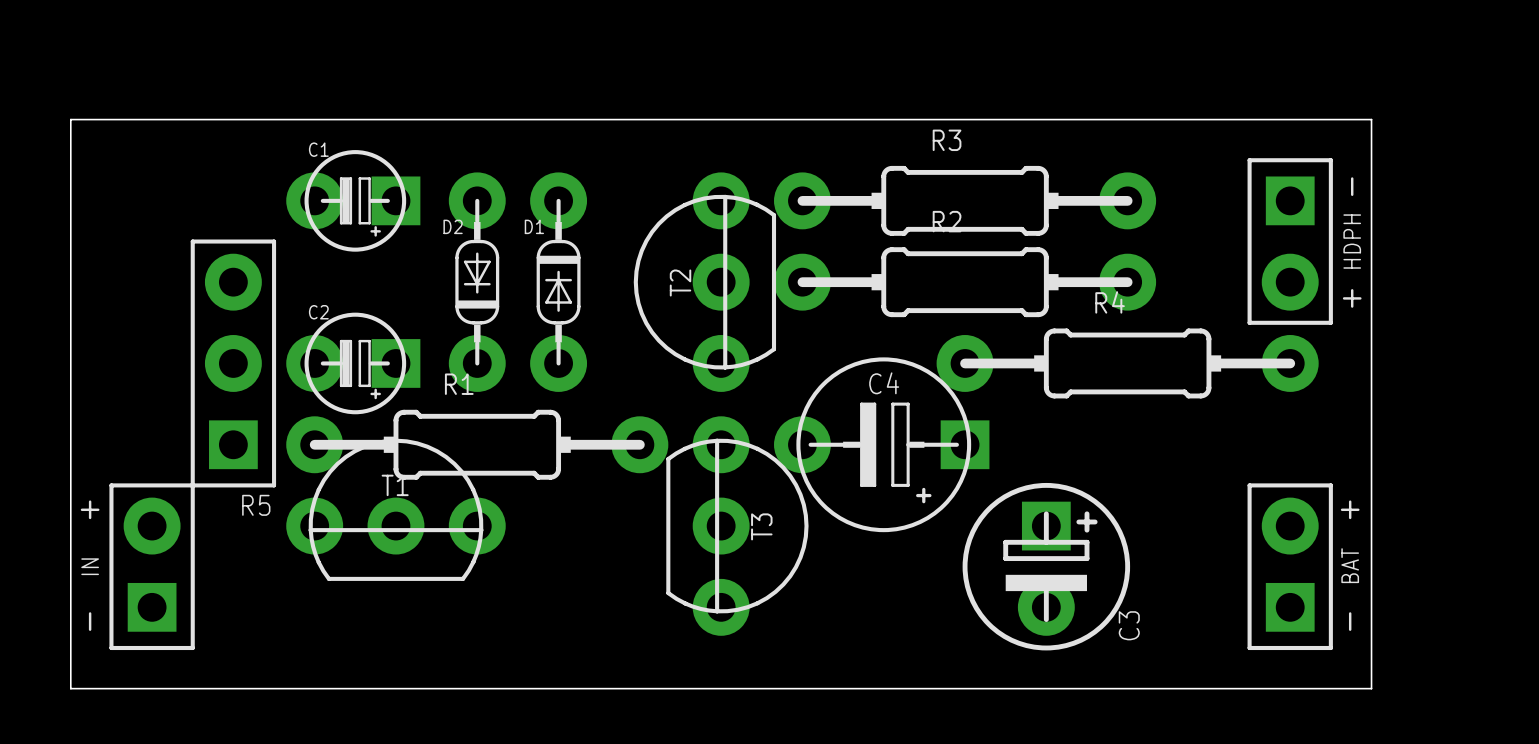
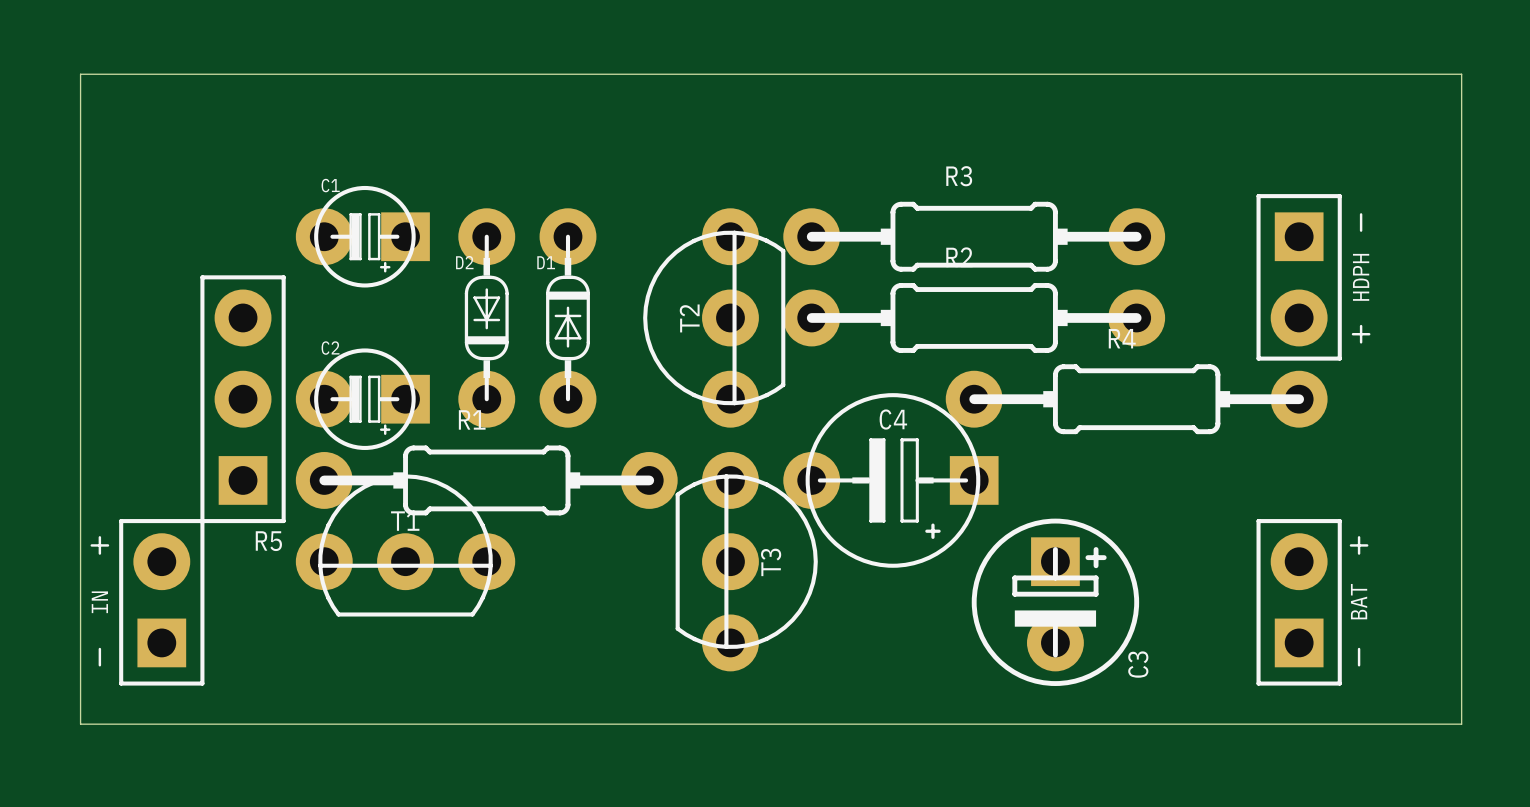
board edge: (70, 119) (1371, 119) (1371, 688) -> (80, 155) (80, 74) (1461, 74) (1461, 724) (1380, 724)

